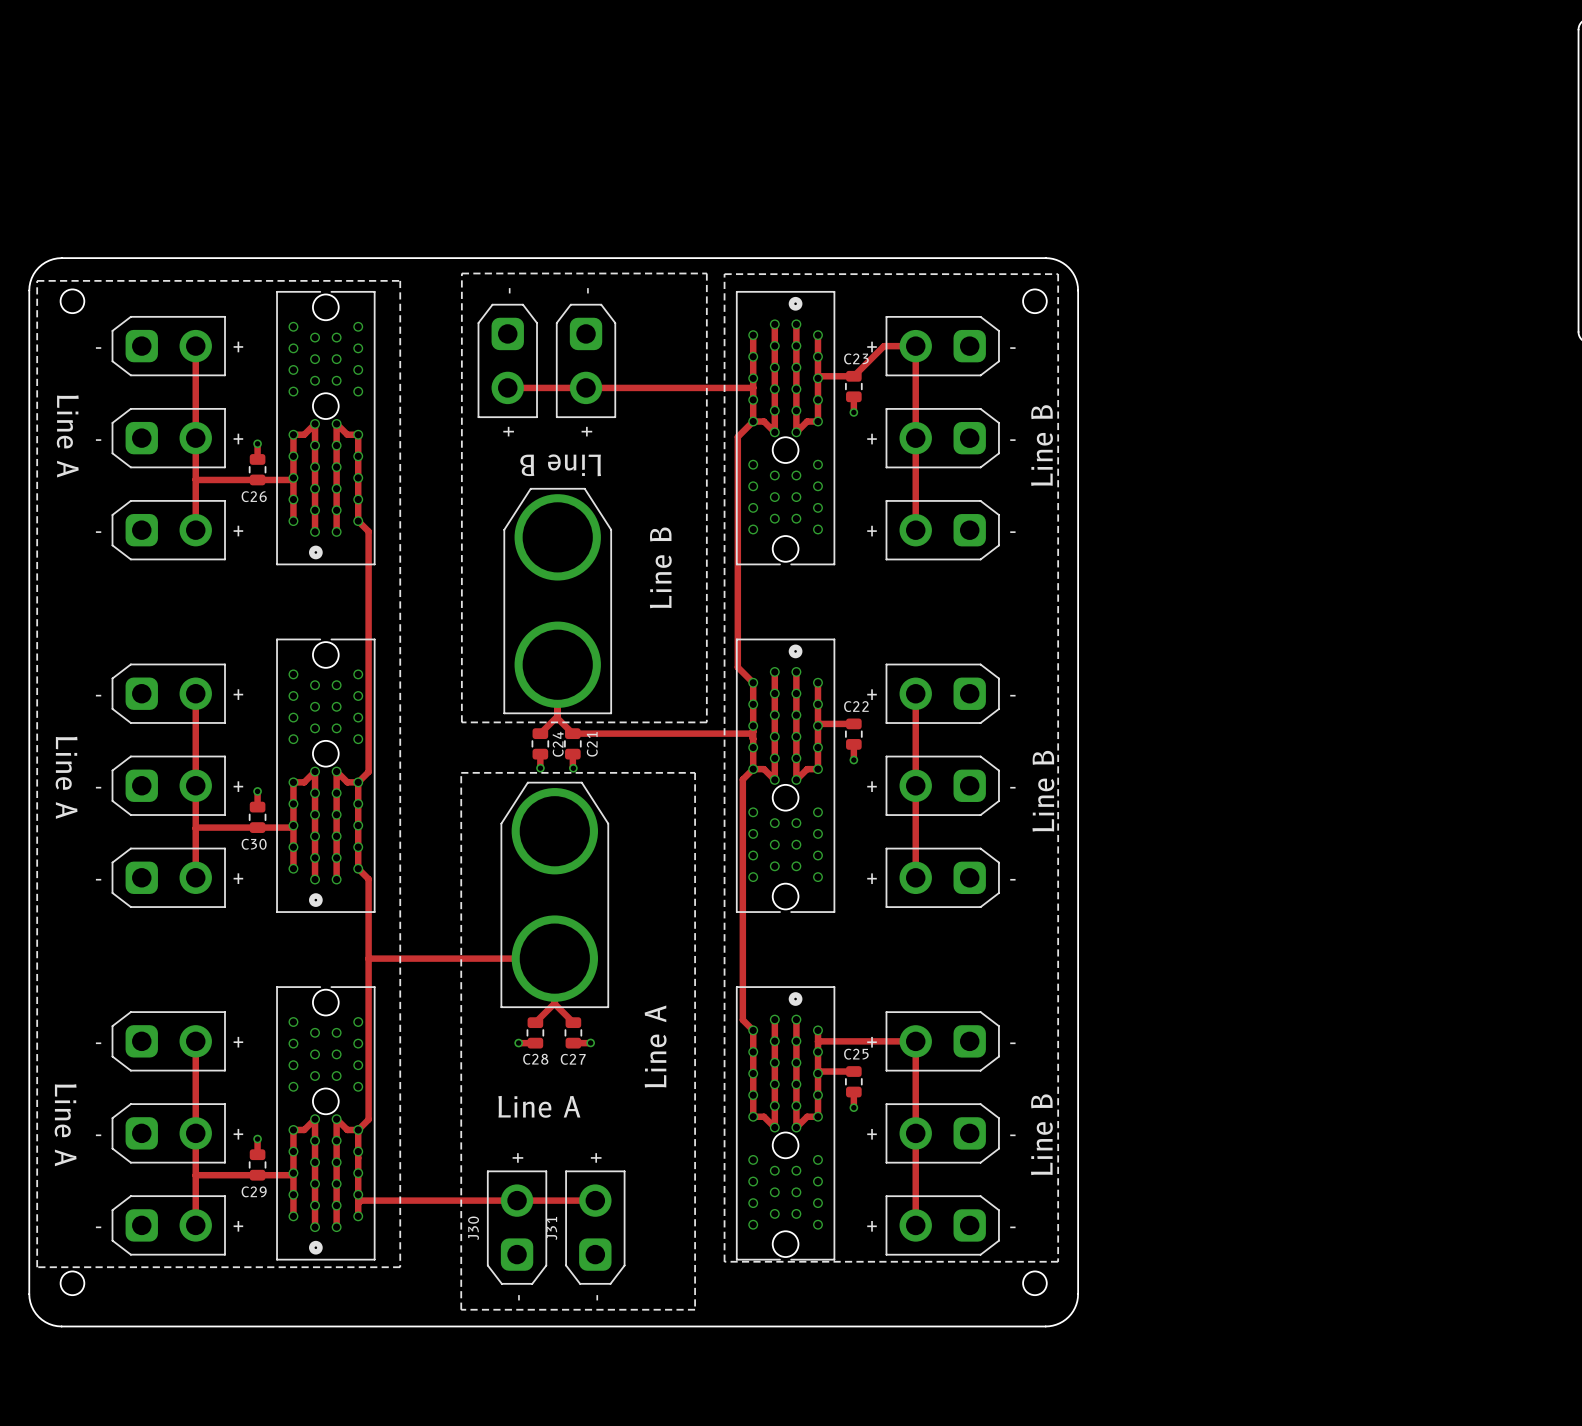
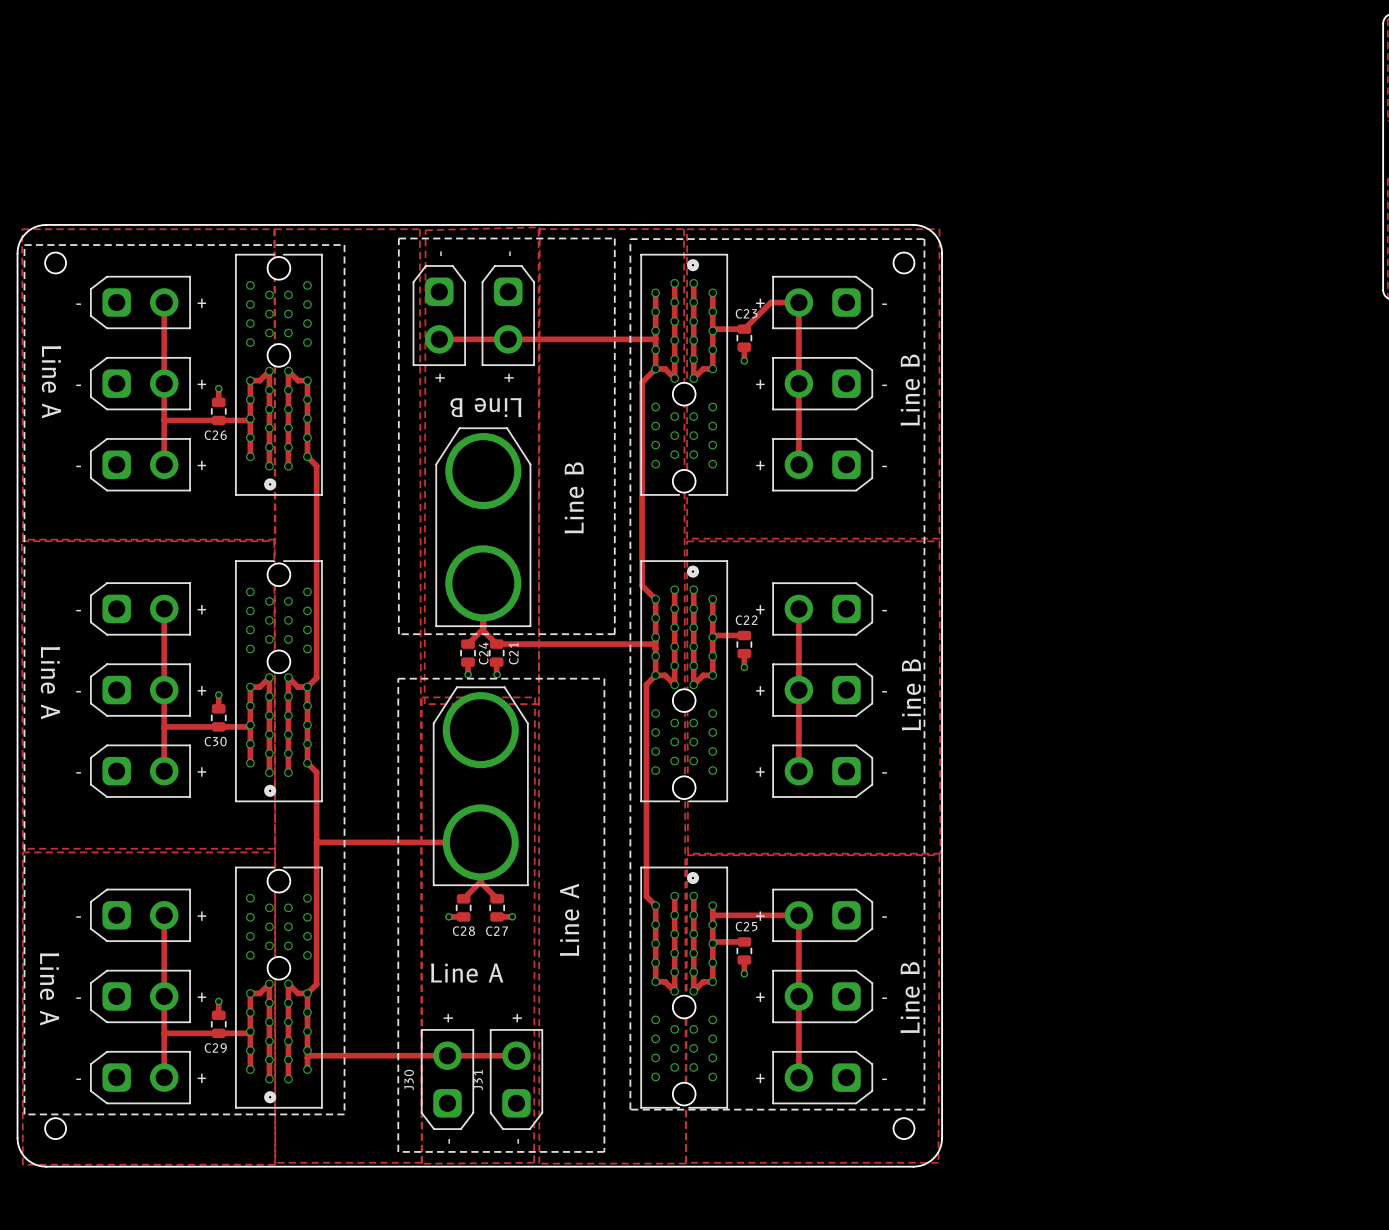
zone outline: none -> (539, 227) (425, 230) (424, 704) (538, 704) (539, 227)
zone outline: none -> (22, 229) (419, 229) (421, 1162) (275, 1162) (274, 229) (275, 539) (23, 539) (22, 229)
zone outline: none -> (538, 229) (539, 1163) (685, 1163) (683, 229) (538, 229)
zone outline: none -> (687, 229) (939, 229) (939, 538) (687, 538) (687, 229)
zone outline: none -> (21, 541) (22, 848) (275, 848) (274, 541) (21, 541)
zone outline: none -> (687, 541) (939, 541) (940, 853) (688, 853) (687, 541)
zone outline: none -> (421, 697) (535, 697) (534, 1162) (421, 1163) (421, 697)
zone outline: none -> (22, 852) (22, 1164) (275, 1164) (275, 852) (22, 852)
zone outline: none -> (687, 855) (939, 855) (938, 1162) (686, 1162) (687, 855)

